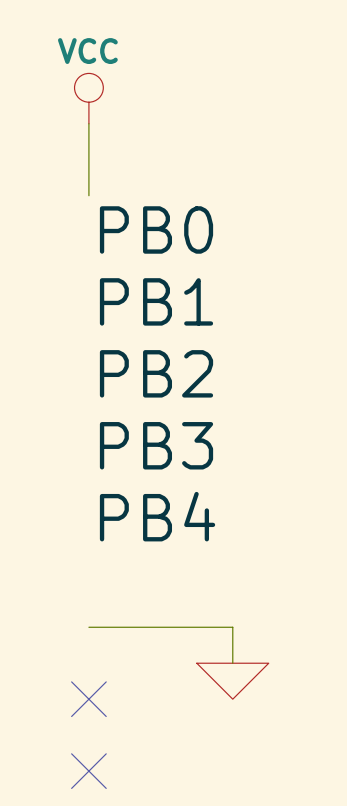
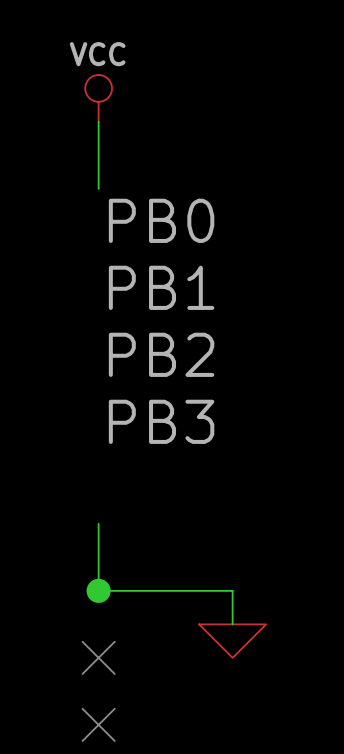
label: PB4 (157, 516) -> none
wire: none -> (98, 523) (98, 590)
junction: none -> (98, 590)

